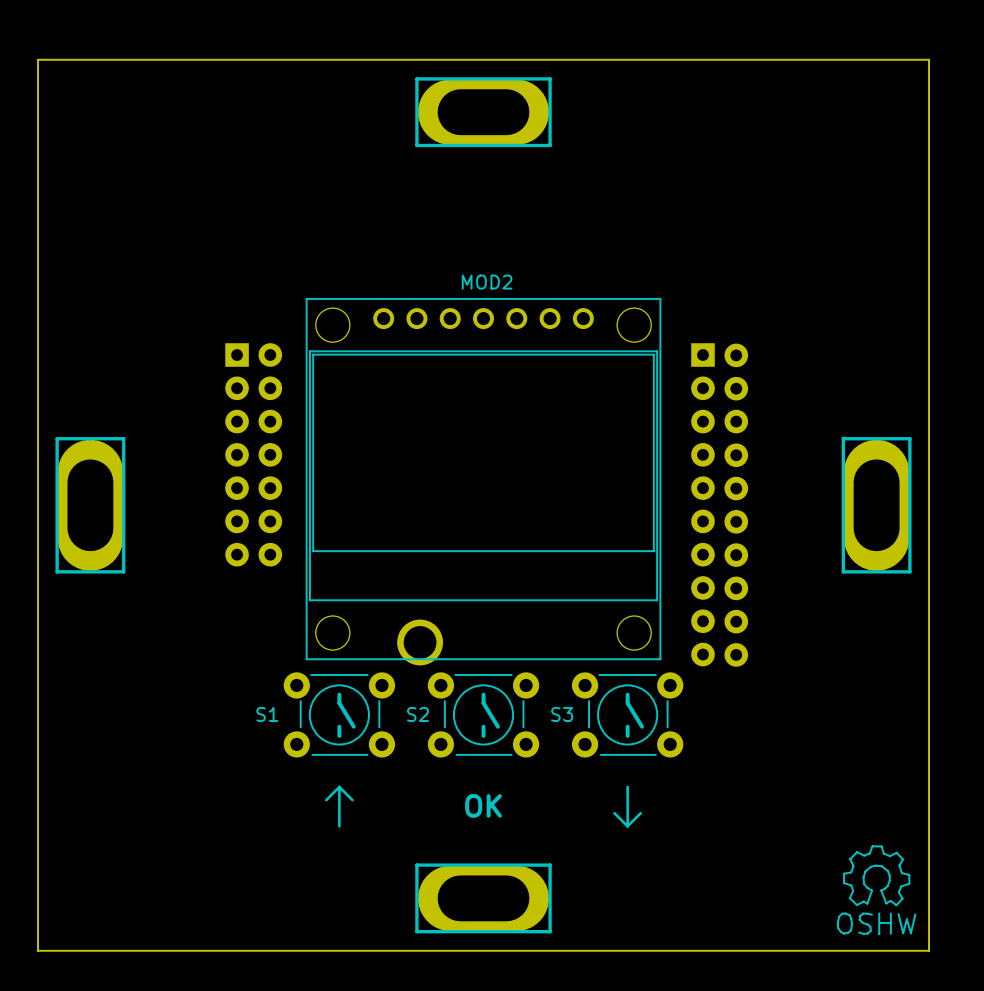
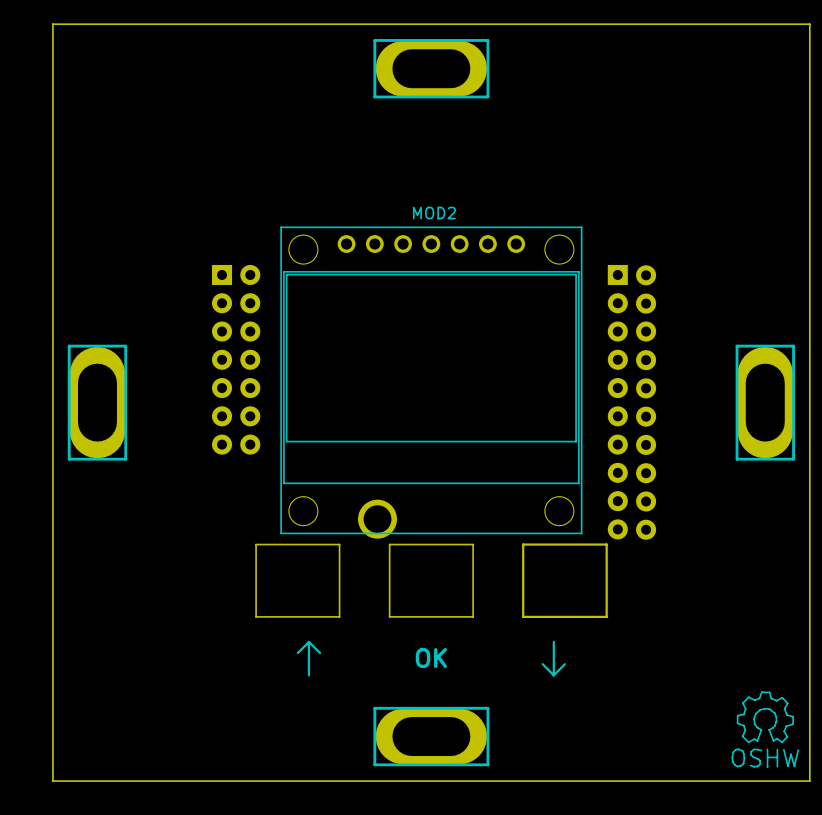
board edge: none -> (256, 544) (339, 544) (339, 616) (256, 616) (256, 544)
board edge: none -> (389, 544) (389, 616) (473, 616) (473, 544) (389, 544)
board edge: none -> (523, 544) (606, 544) (606, 616) (523, 616) (523, 544)
S1: (339, 714) -> none
S2: (483, 714) -> none
S3: (627, 714) -> none

